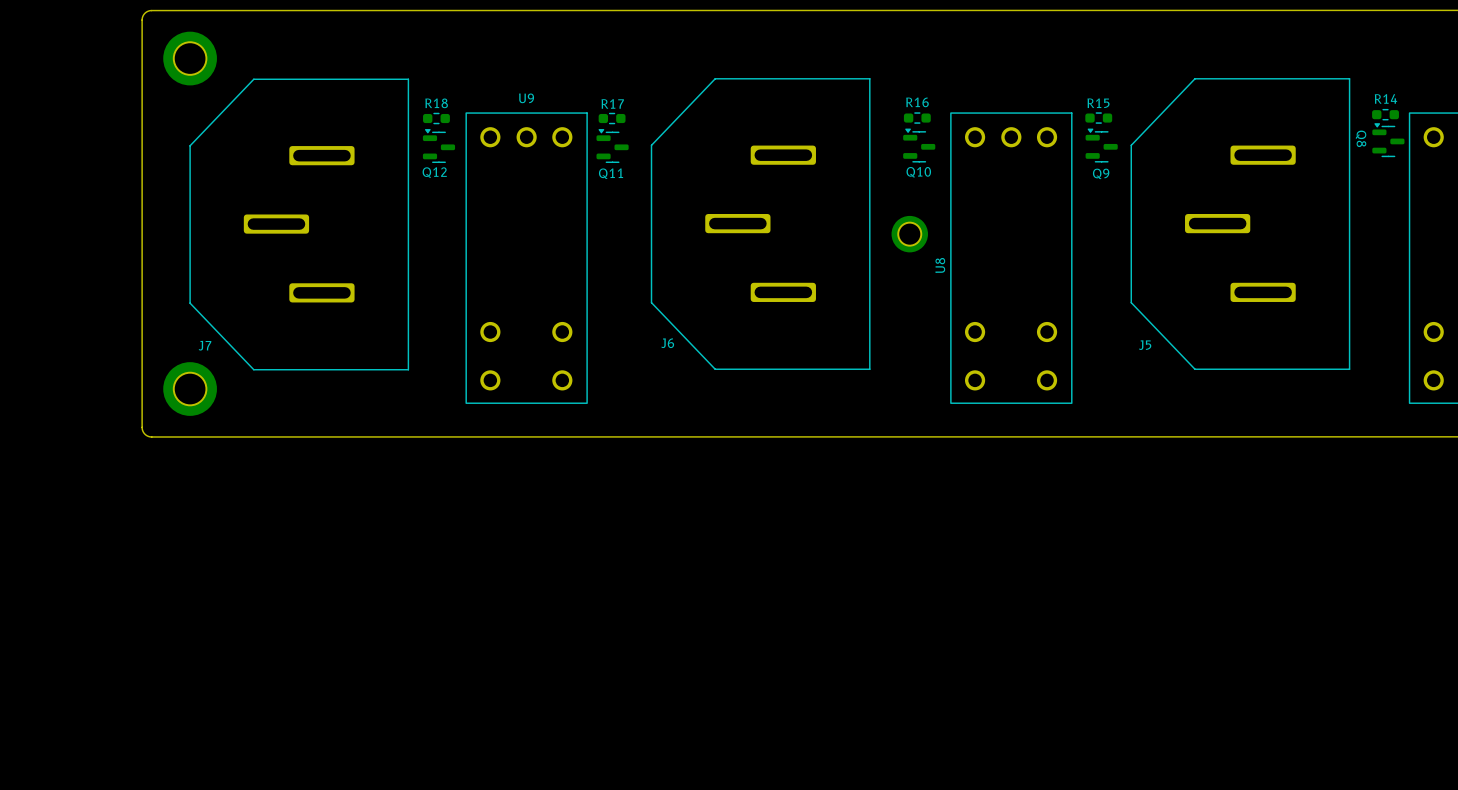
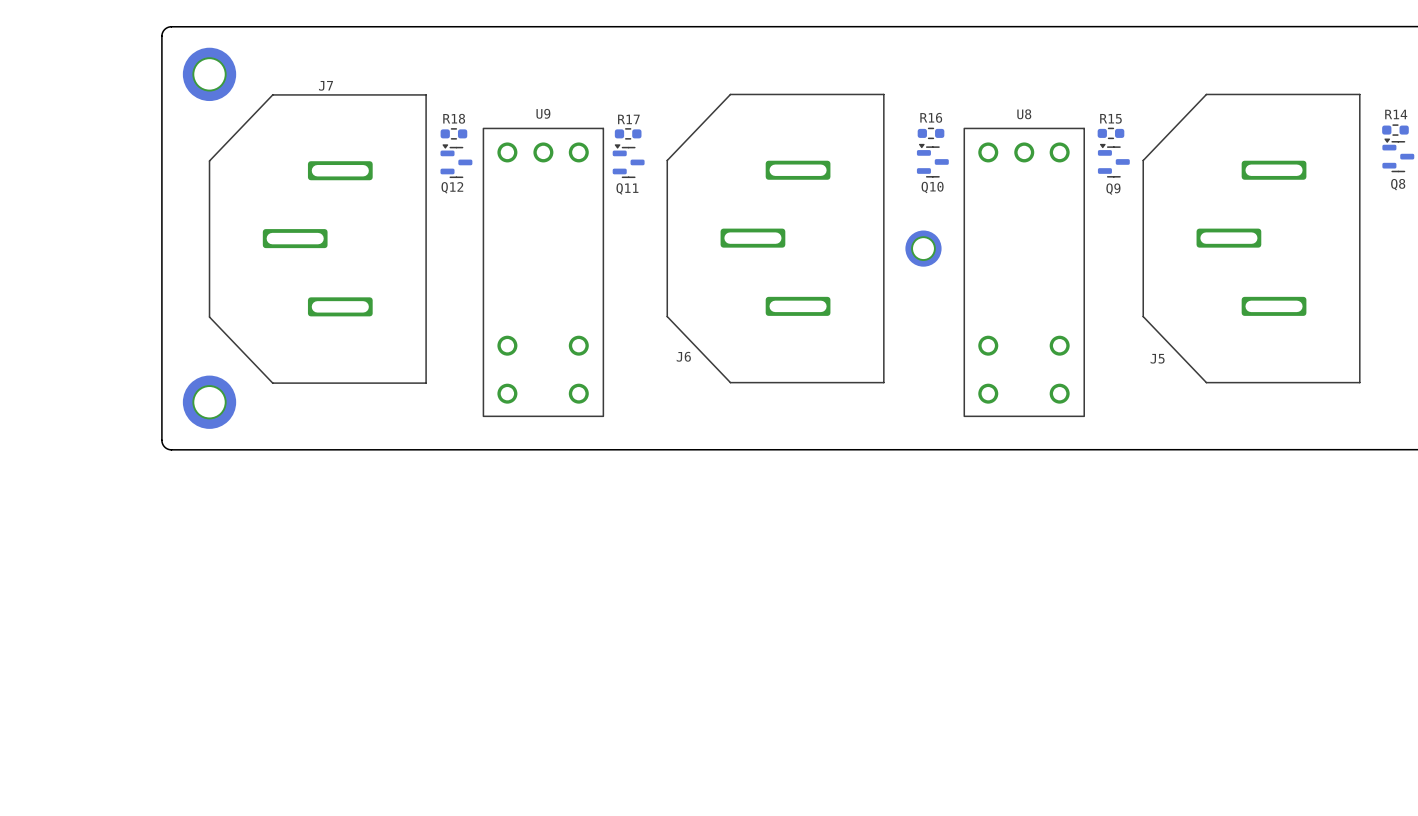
Q8 name rotation: 0° (1361, 138) -> 90° counterclockwise (1398, 184)
Q8 name position: Q8 (1361, 138) -> Q8 (1398, 184)
U8 name rotation: 0° (940, 265) -> 90° clockwise (1024, 114)
U8 name position: U8 (940, 265) -> U8 (1024, 114)
J7 name position: J7 (205, 345) -> J7 (325, 85)

